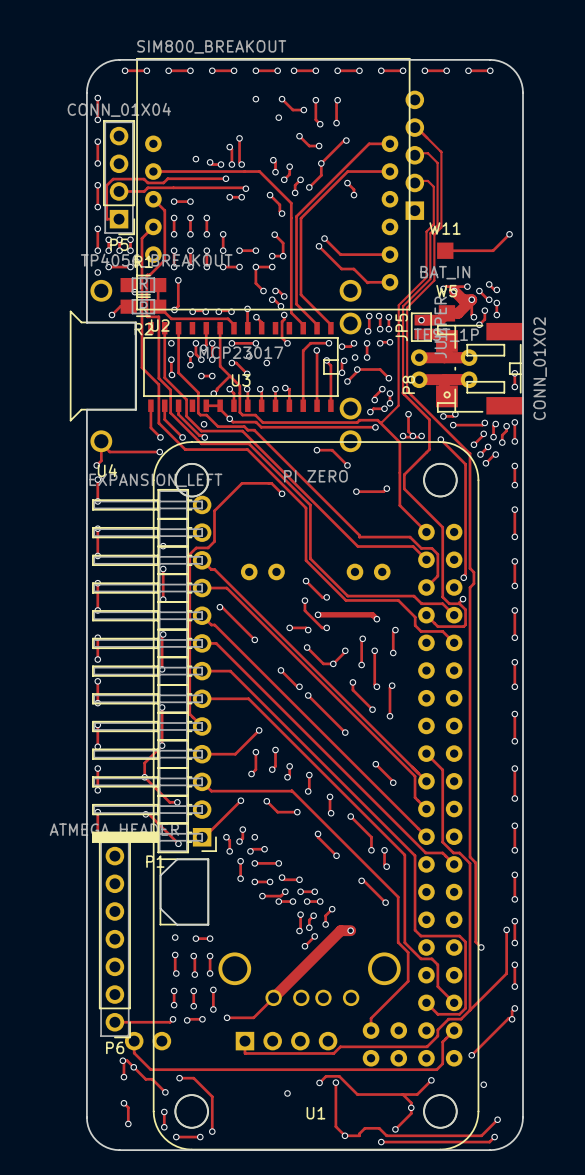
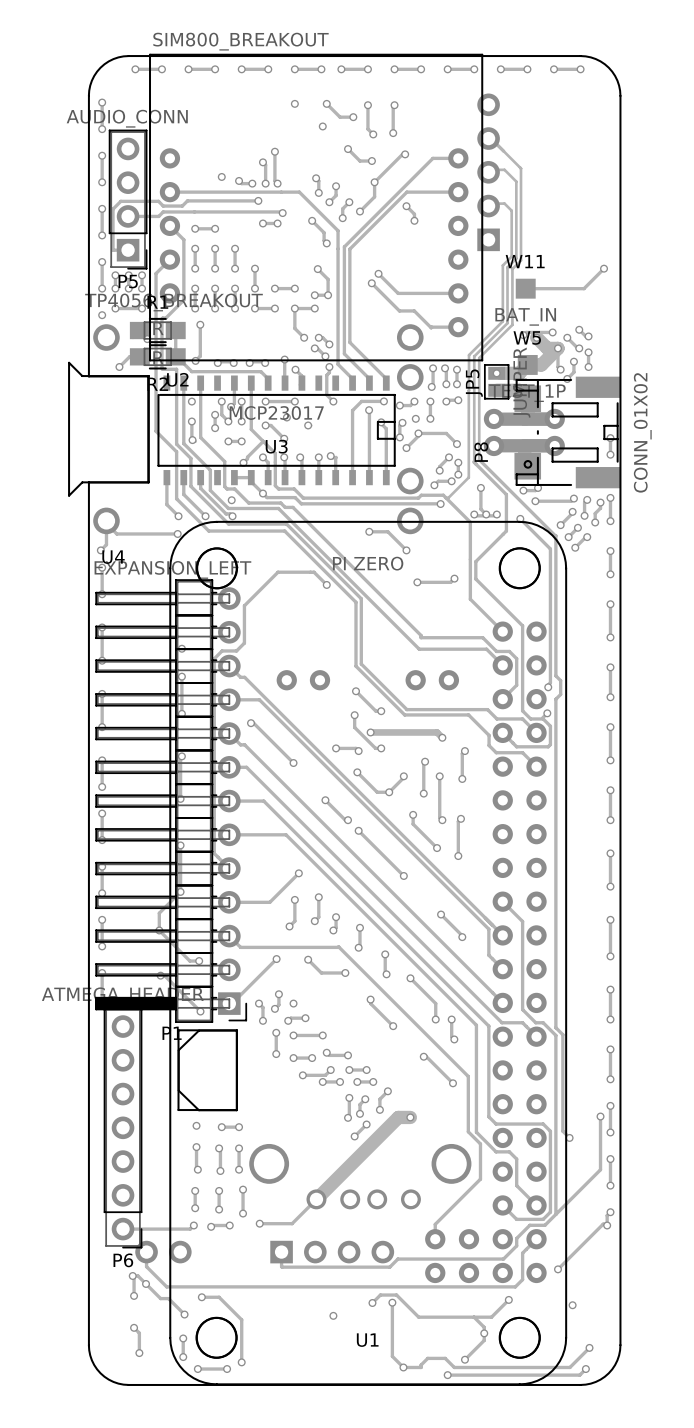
P5 value: CONN_01X04 (119, 109) -> AUDIO_CONN (127, 118)

